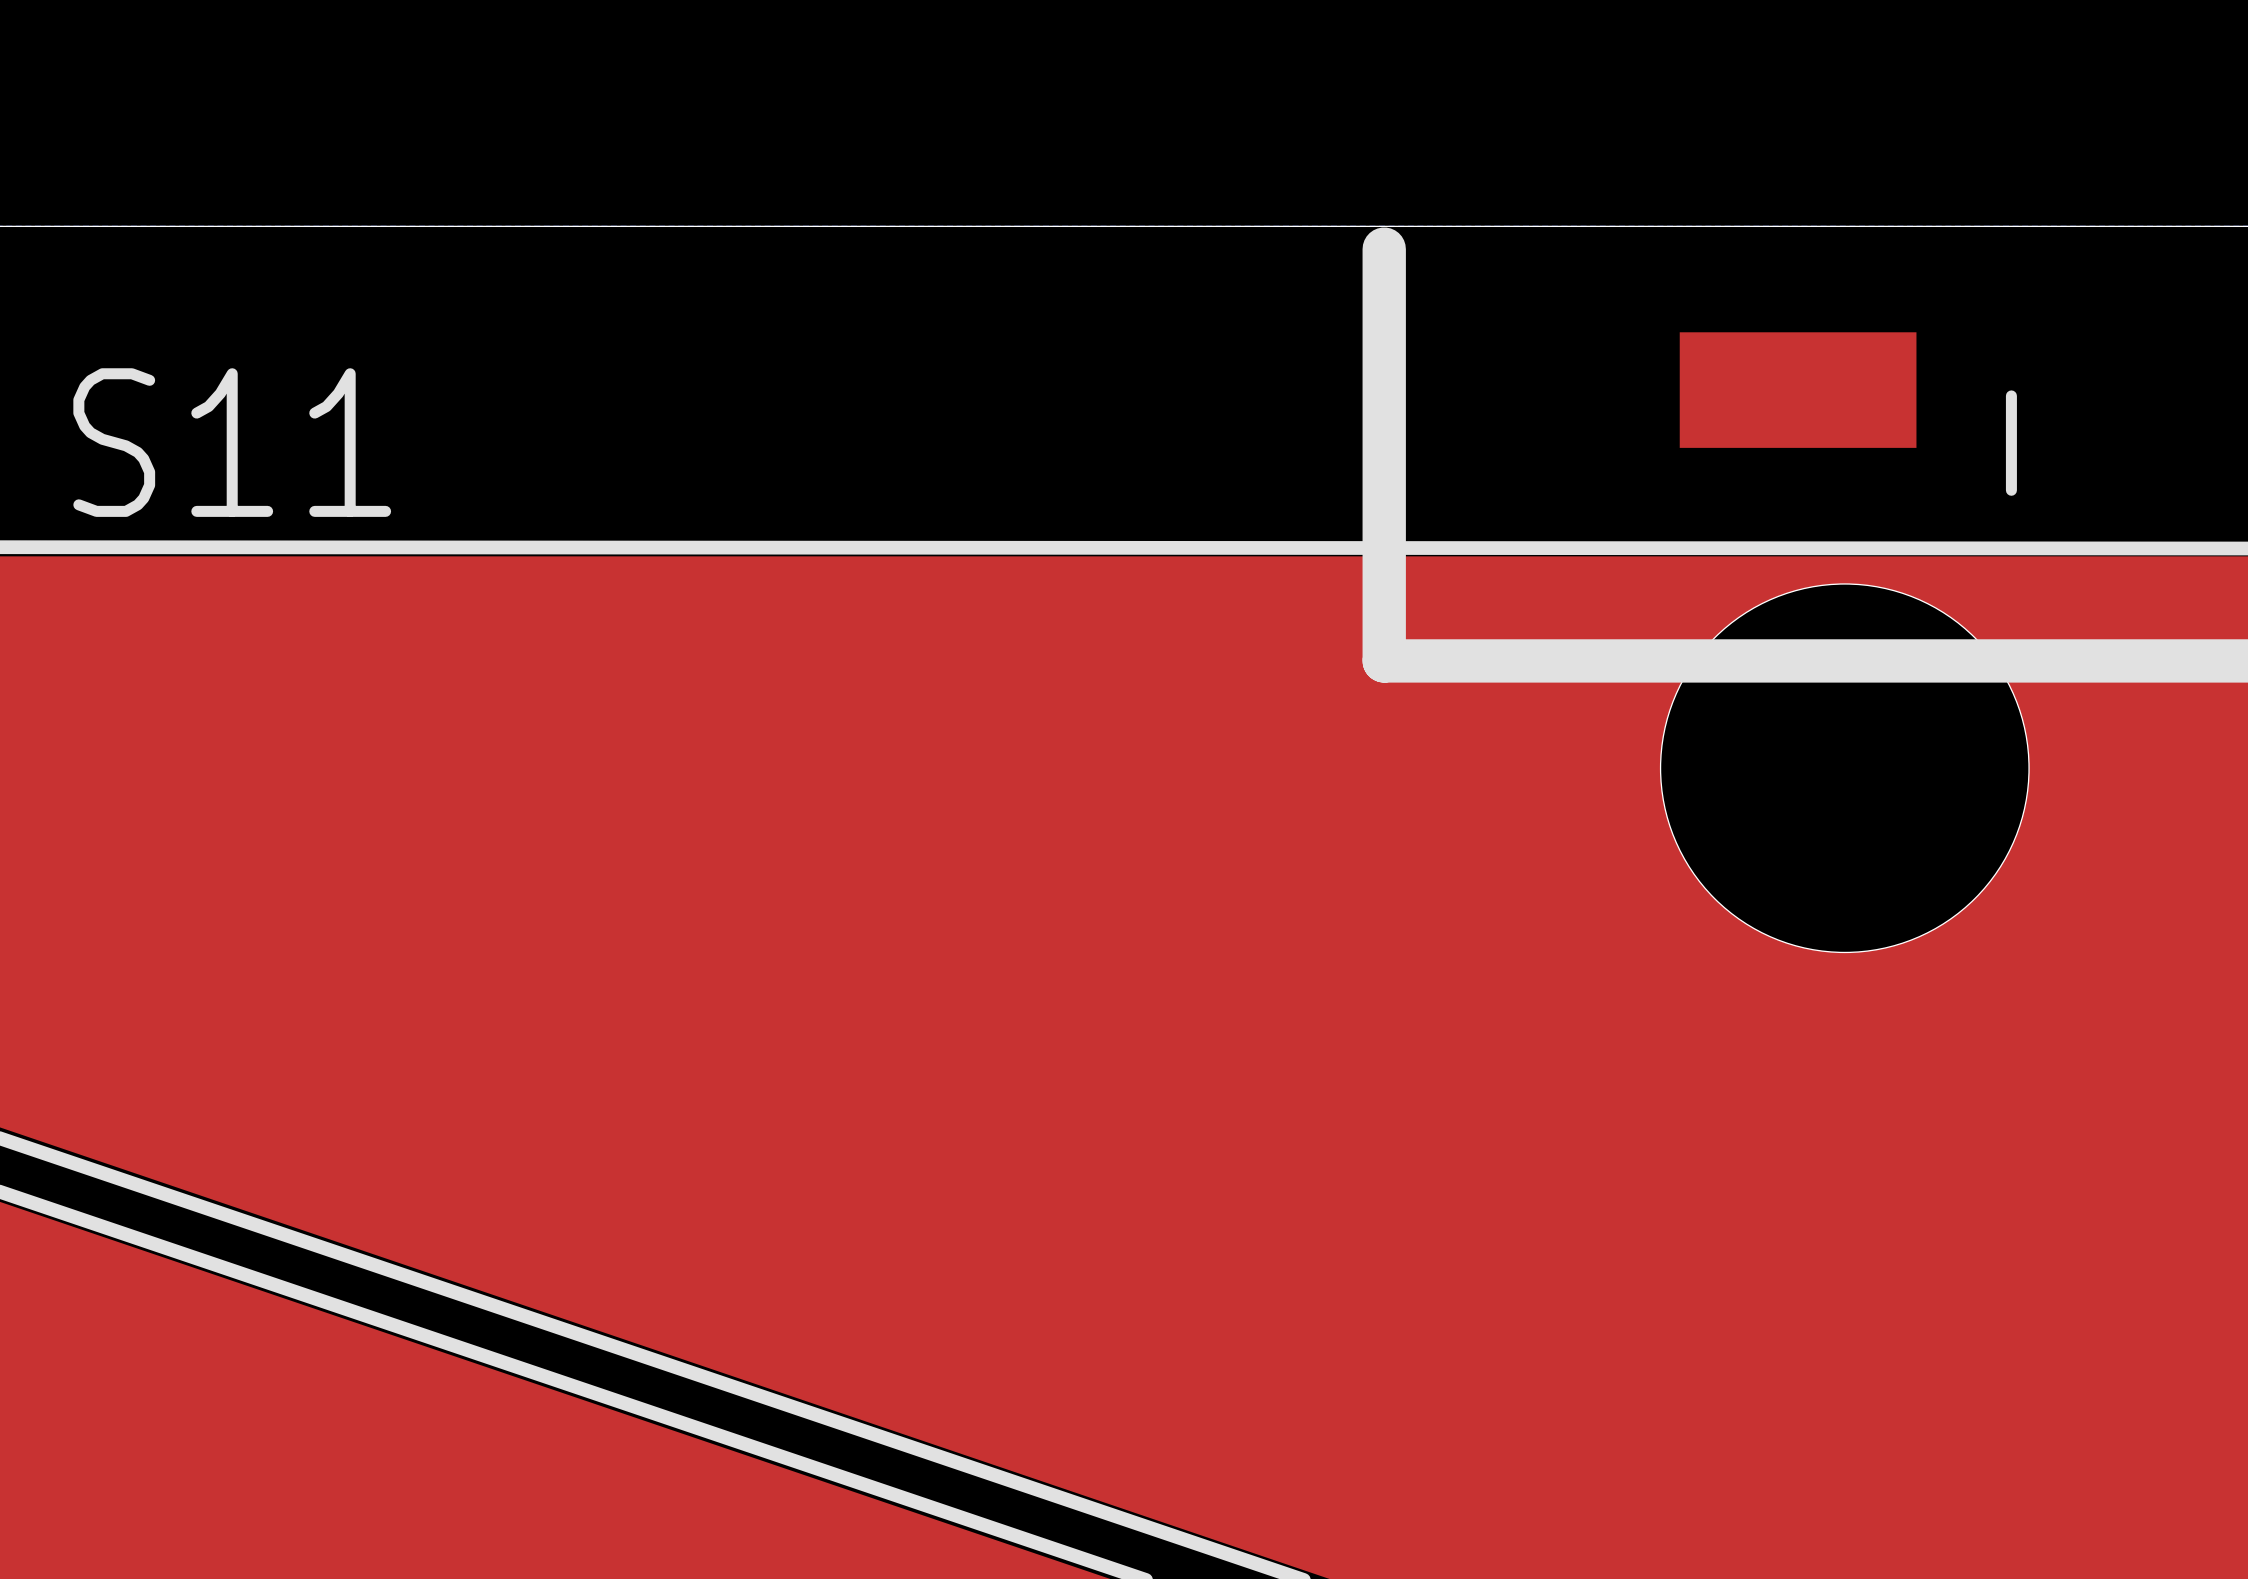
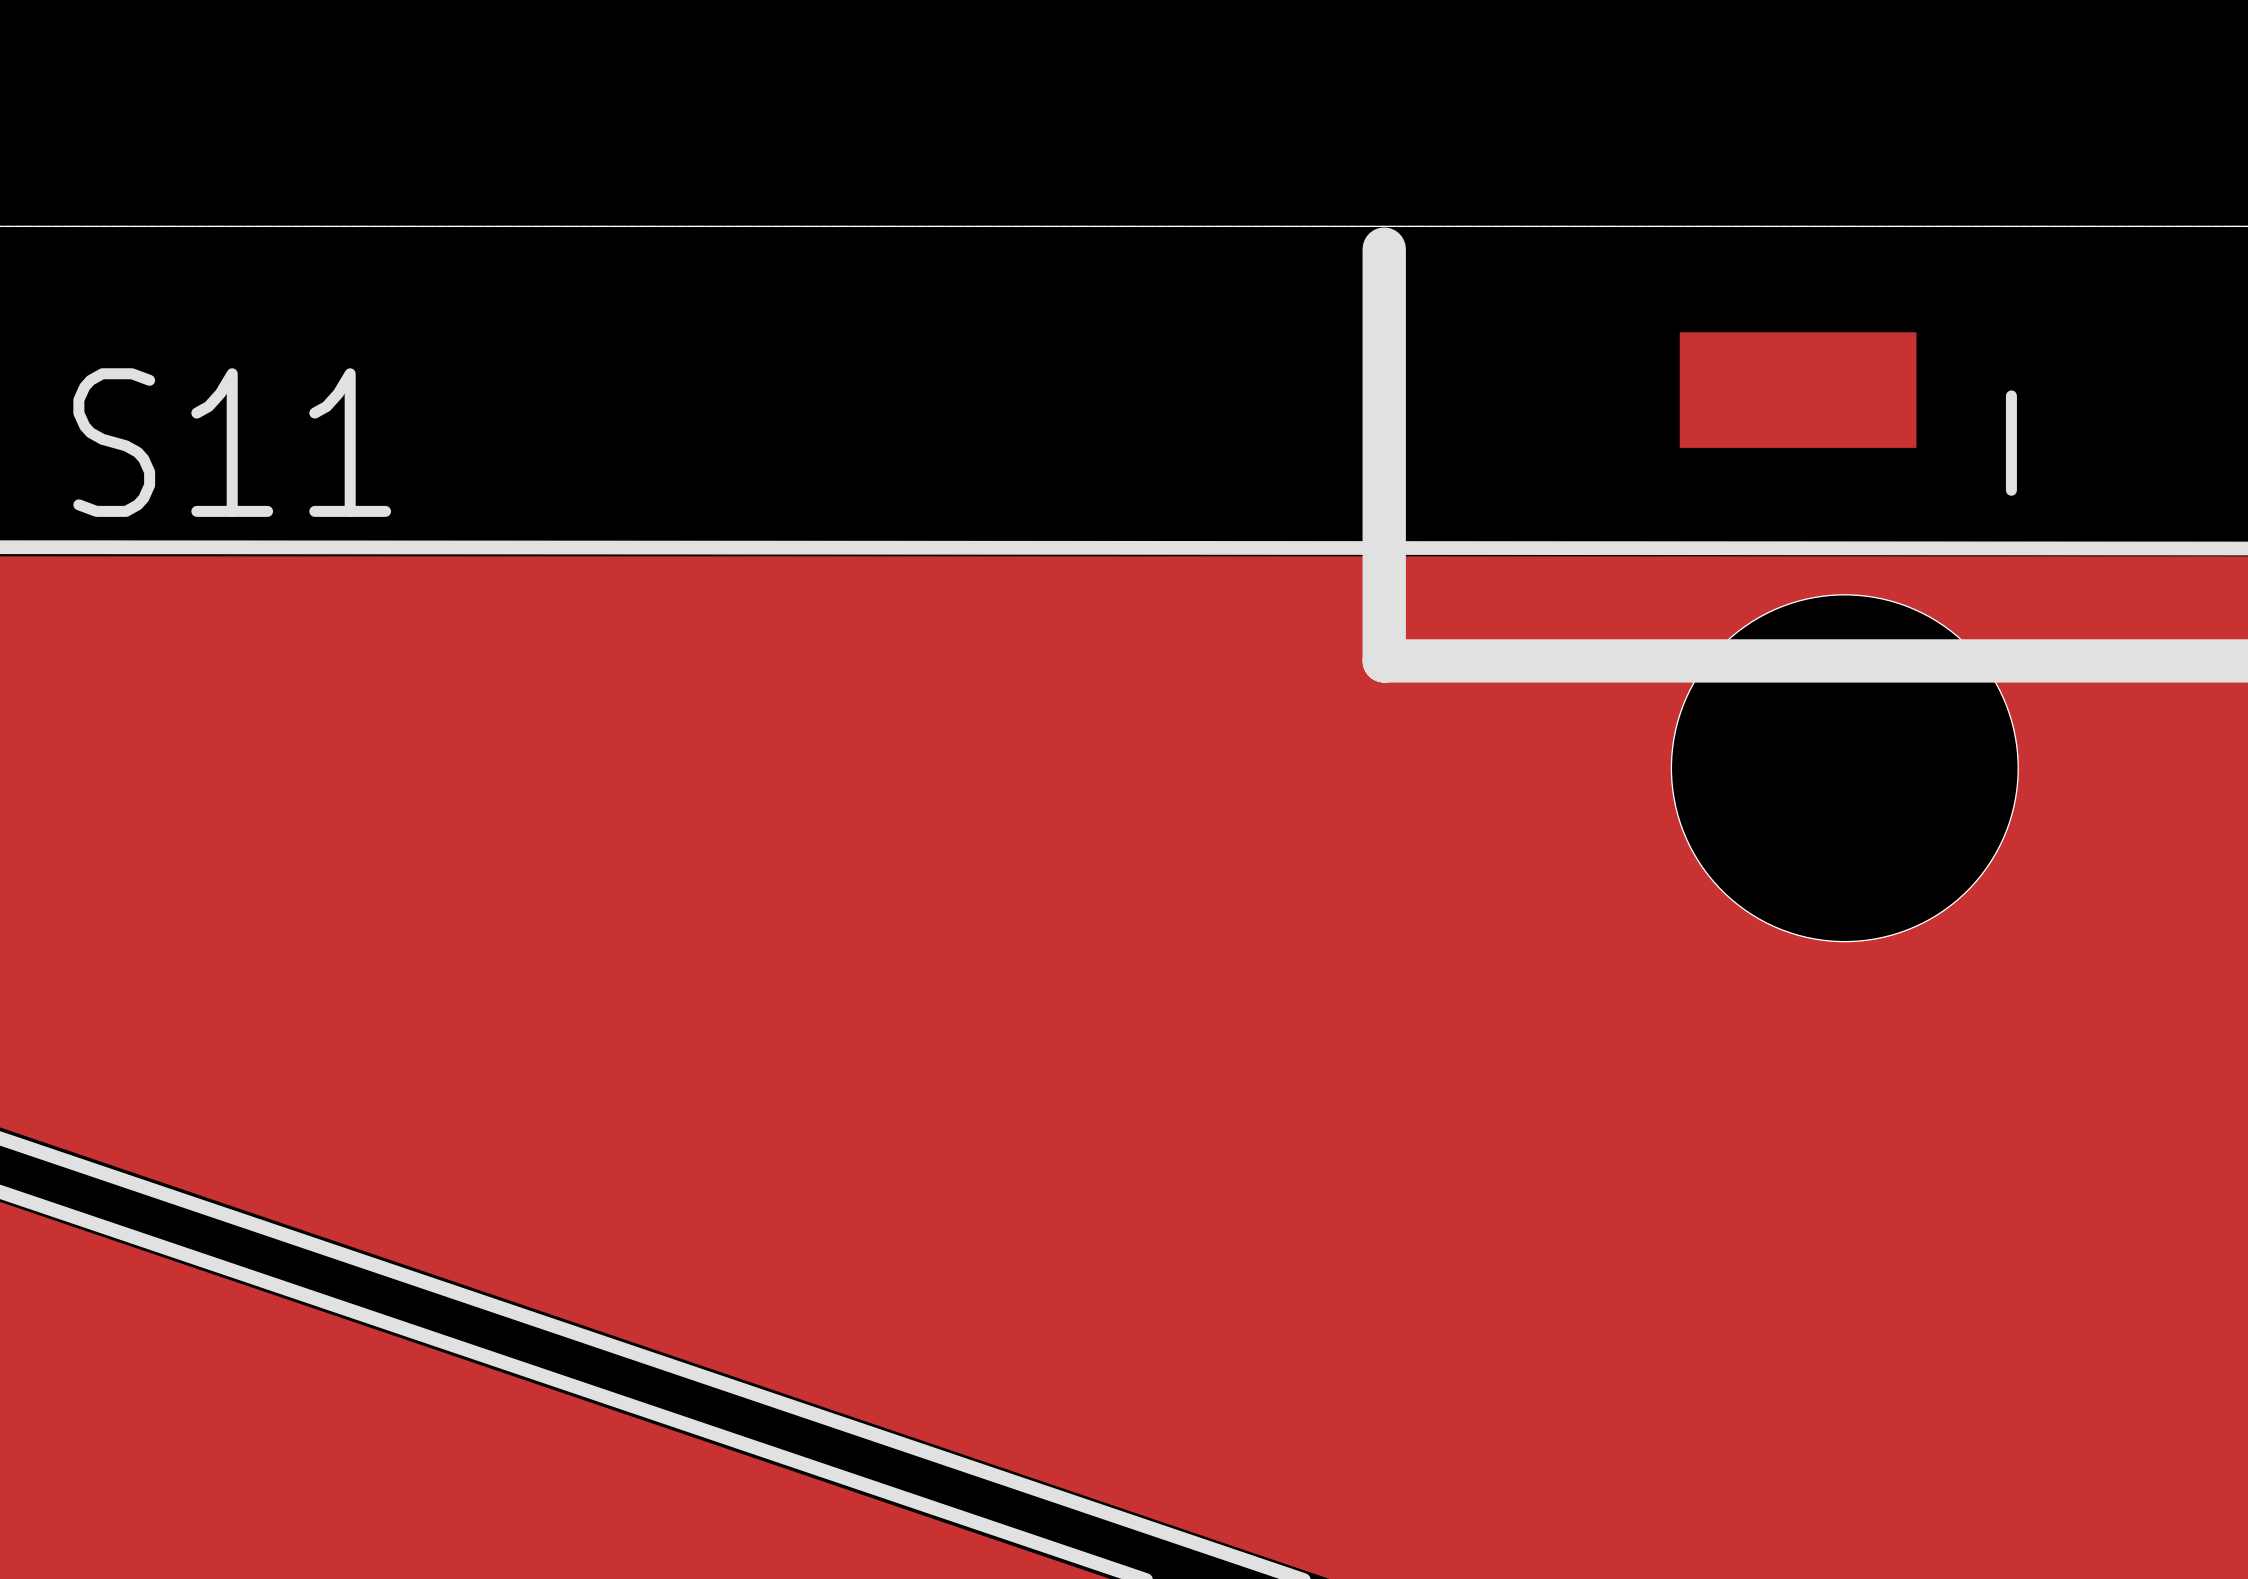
hole size: [1660, 583, 2030, 953] -> [1671, 594, 2019, 942]

